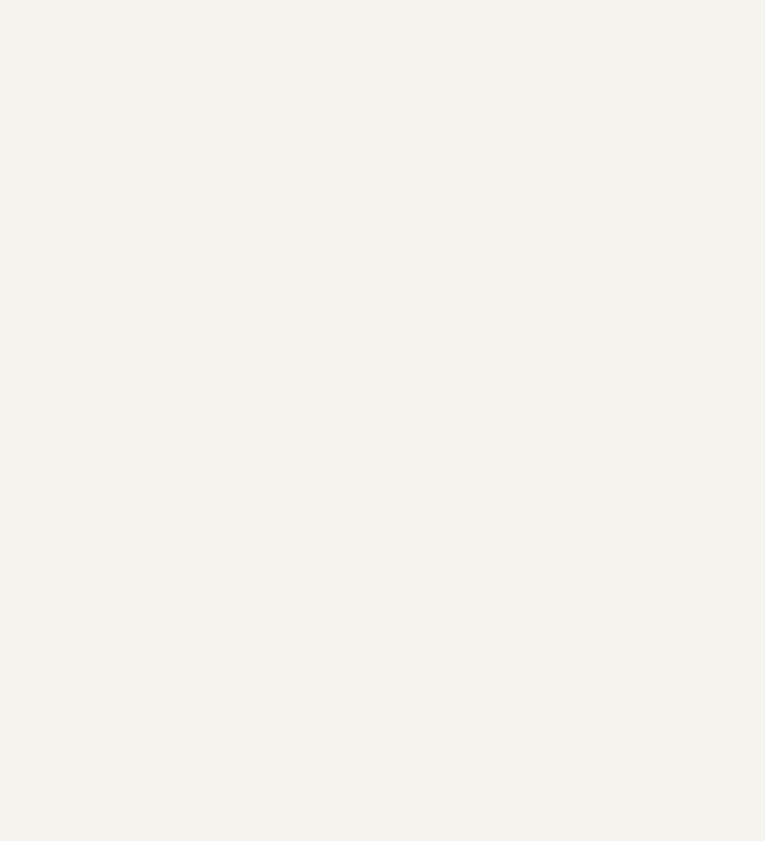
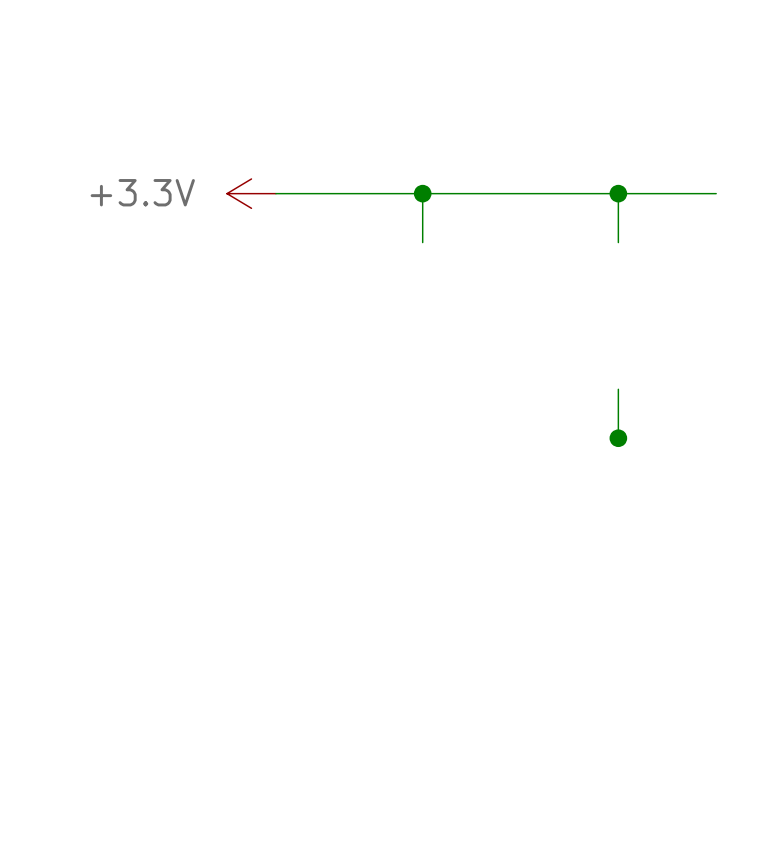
power symbol: none -> +3.3V (251, 193)
wire: none -> (275, 193) (716, 193)
wire: none -> (422, 193) (422, 242)
junction: none -> (422, 193)
wire: none -> (618, 193) (618, 242)
junction: none -> (618, 193)
wire: none -> (618, 389) (618, 438)
junction: none -> (618, 438)

